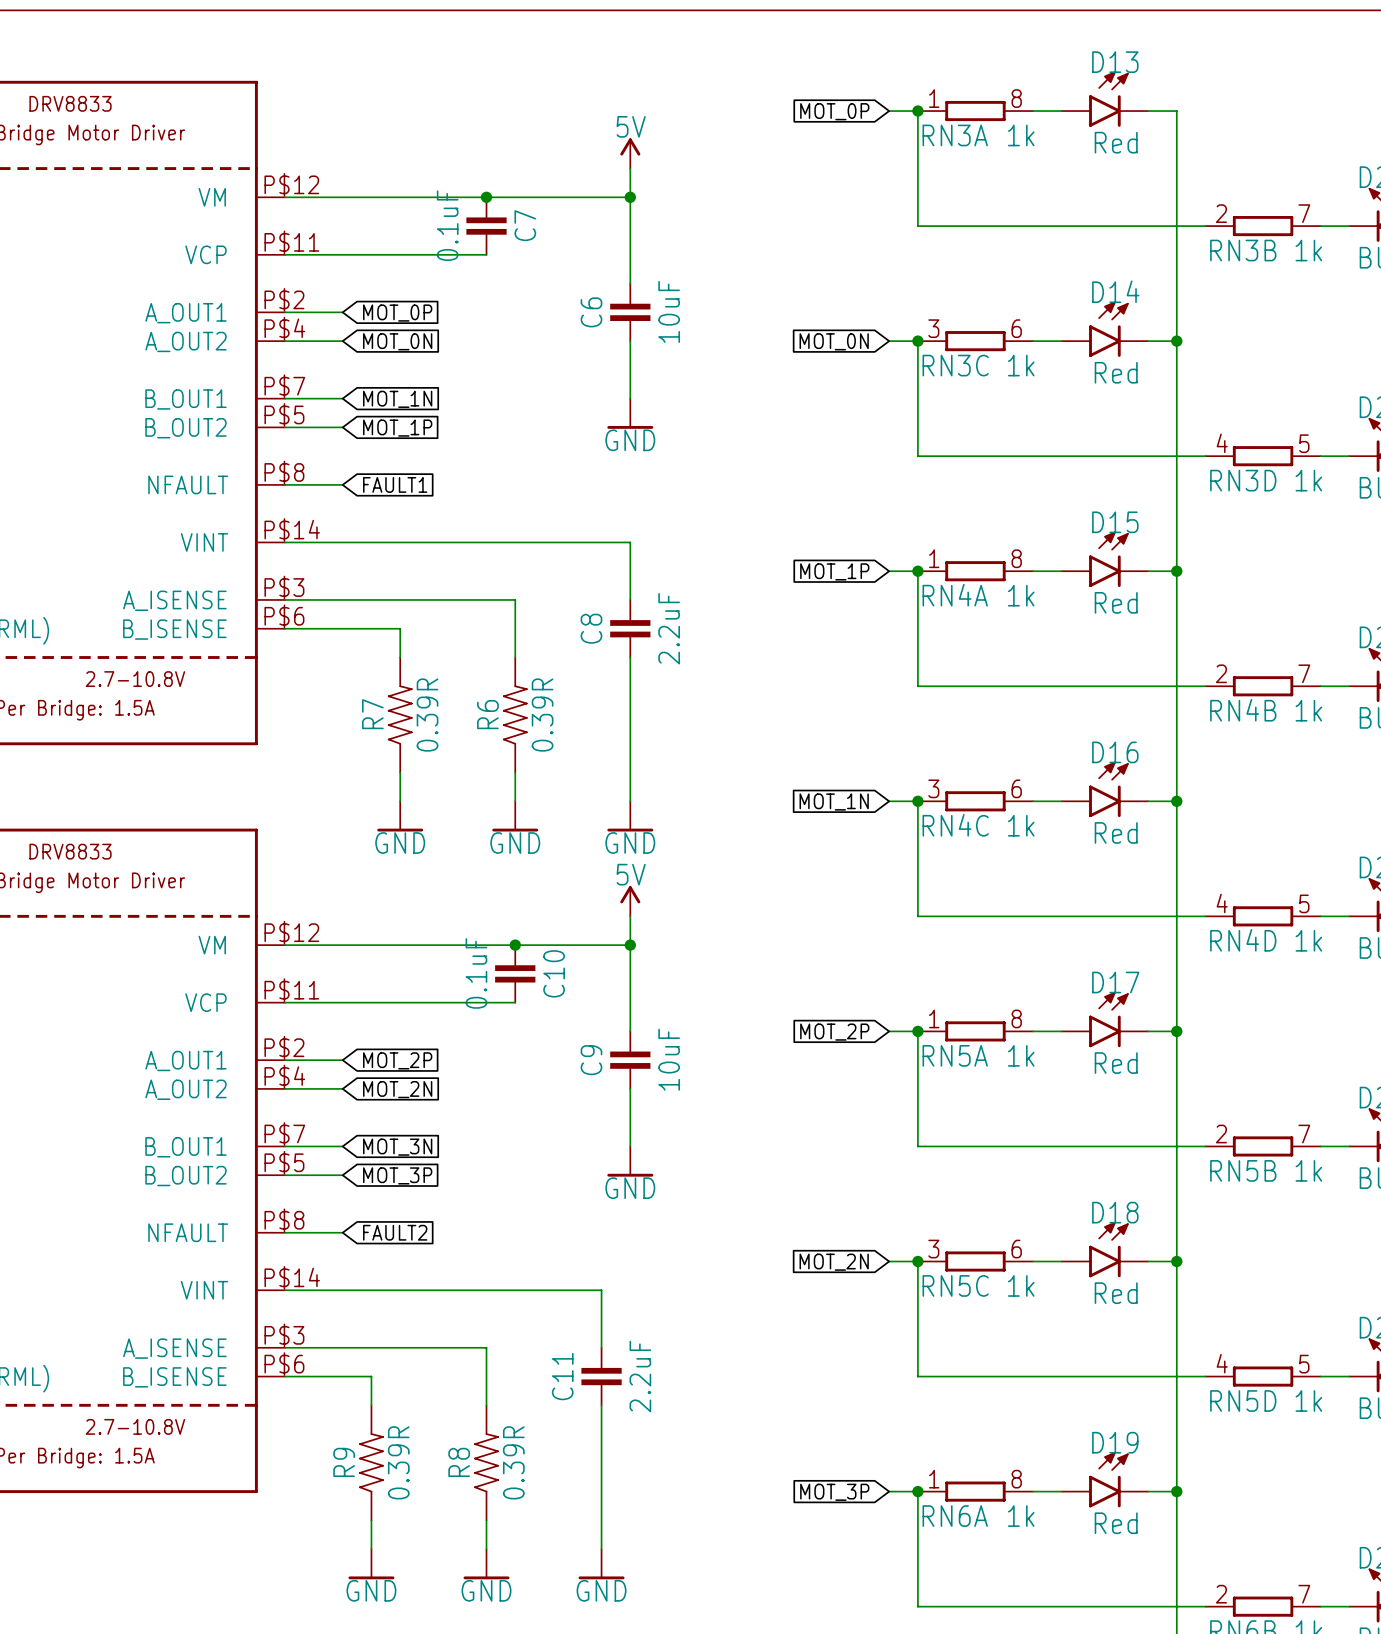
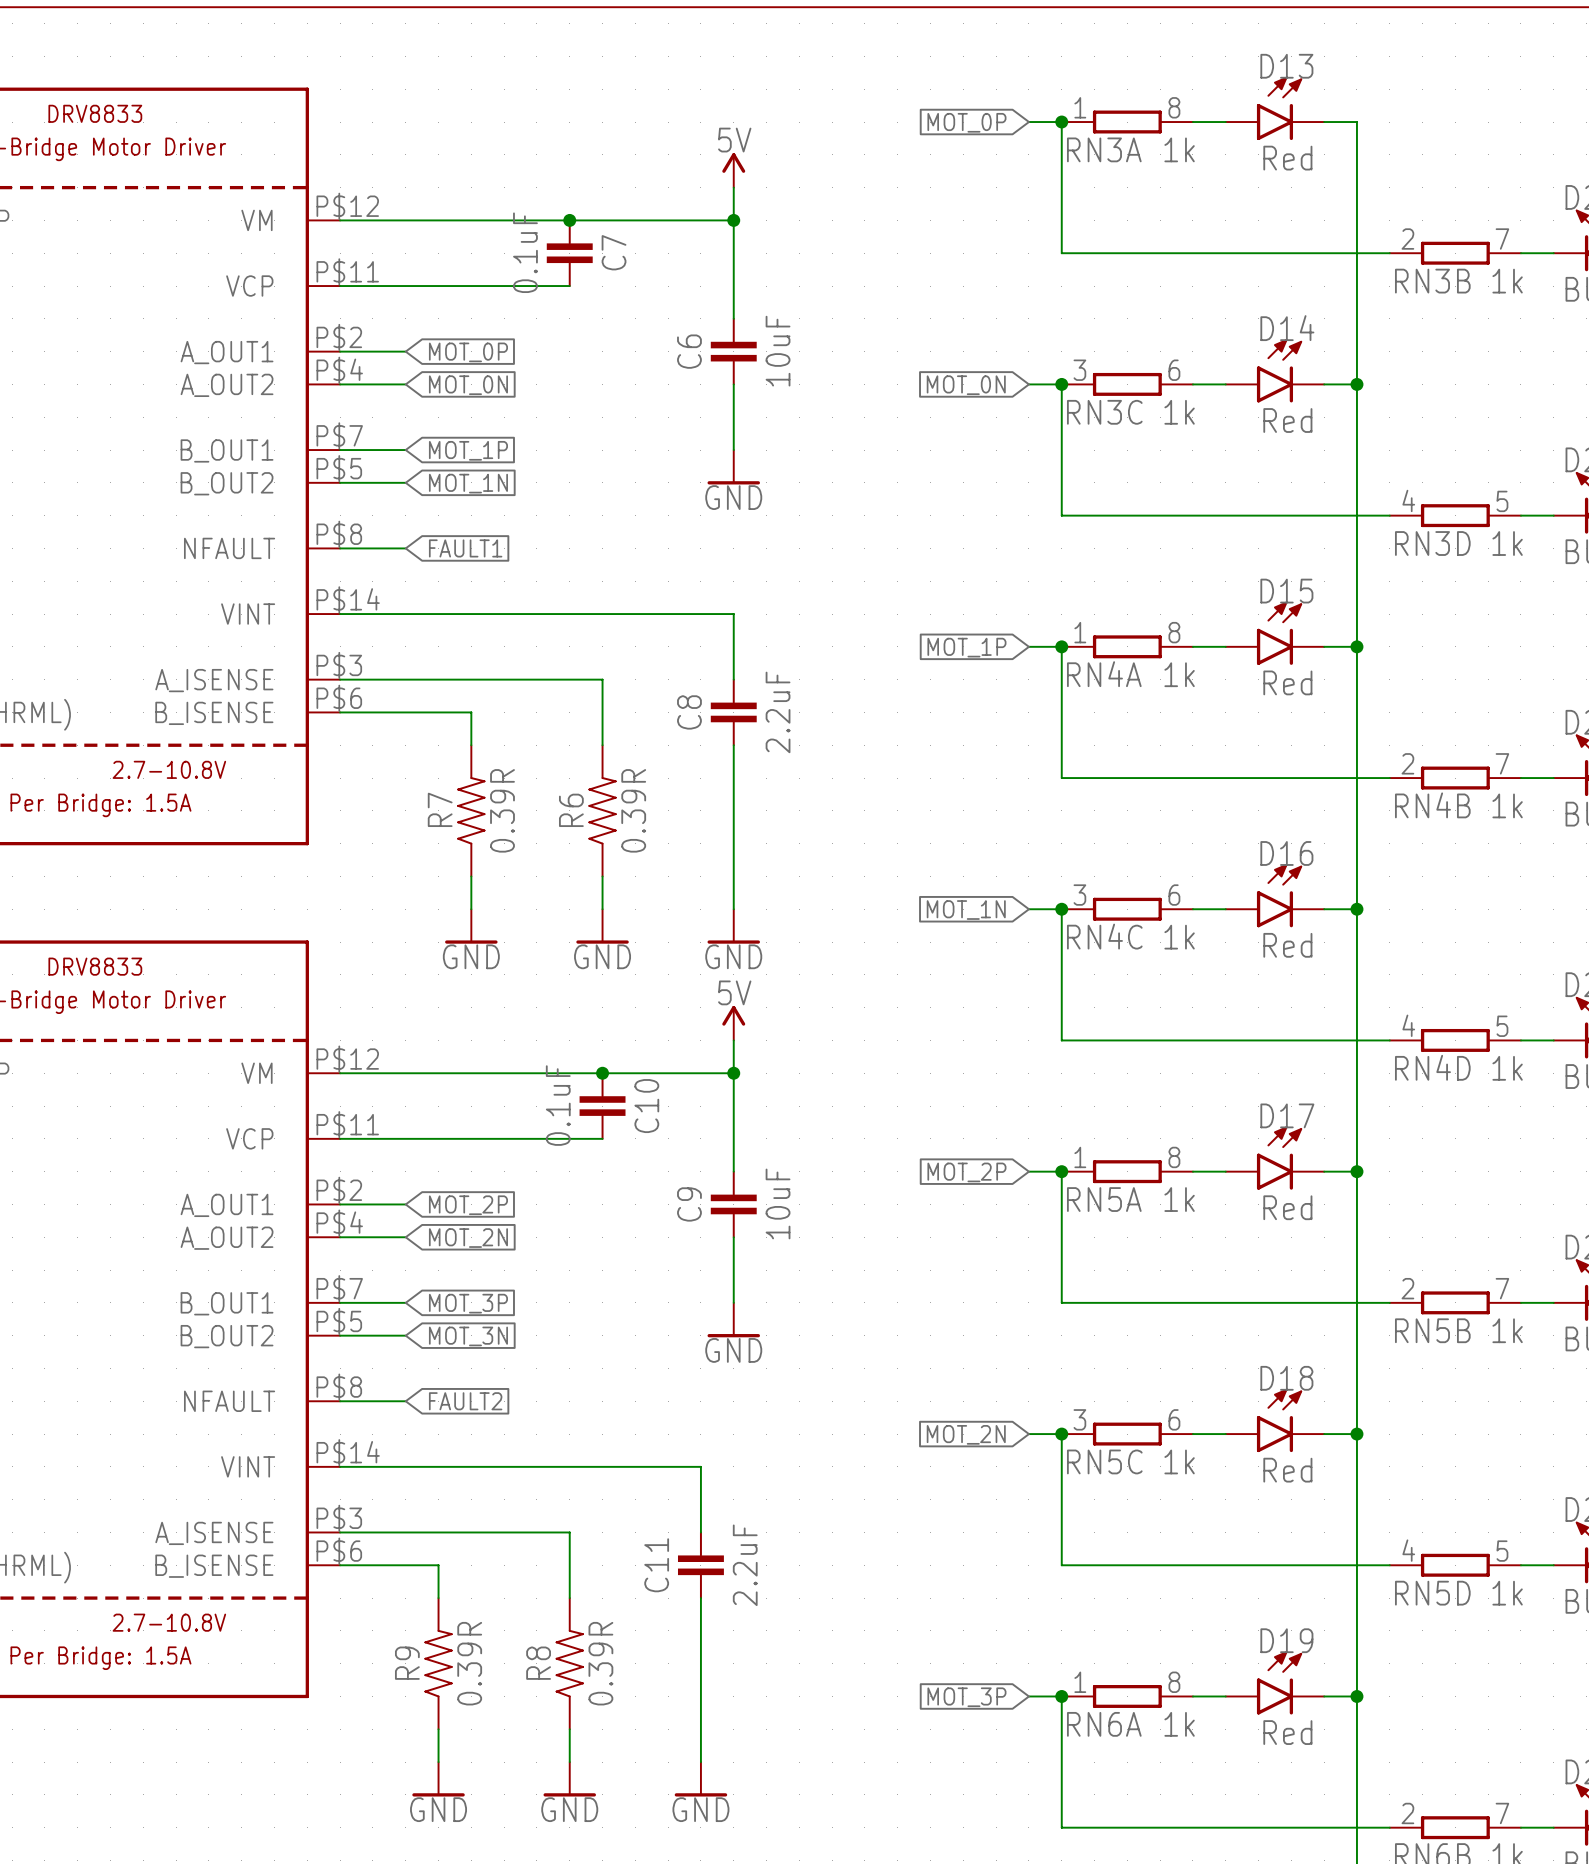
global label: MOT_1N (397, 399) -> MOT_1P (468, 450)
global label: MOT_1P (397, 428) -> MOT_1N (468, 483)
global label: MOT_3N (397, 1147) -> MOT_3P (468, 1303)
global label: MOT_3P (397, 1175) -> MOT_3N (468, 1336)

